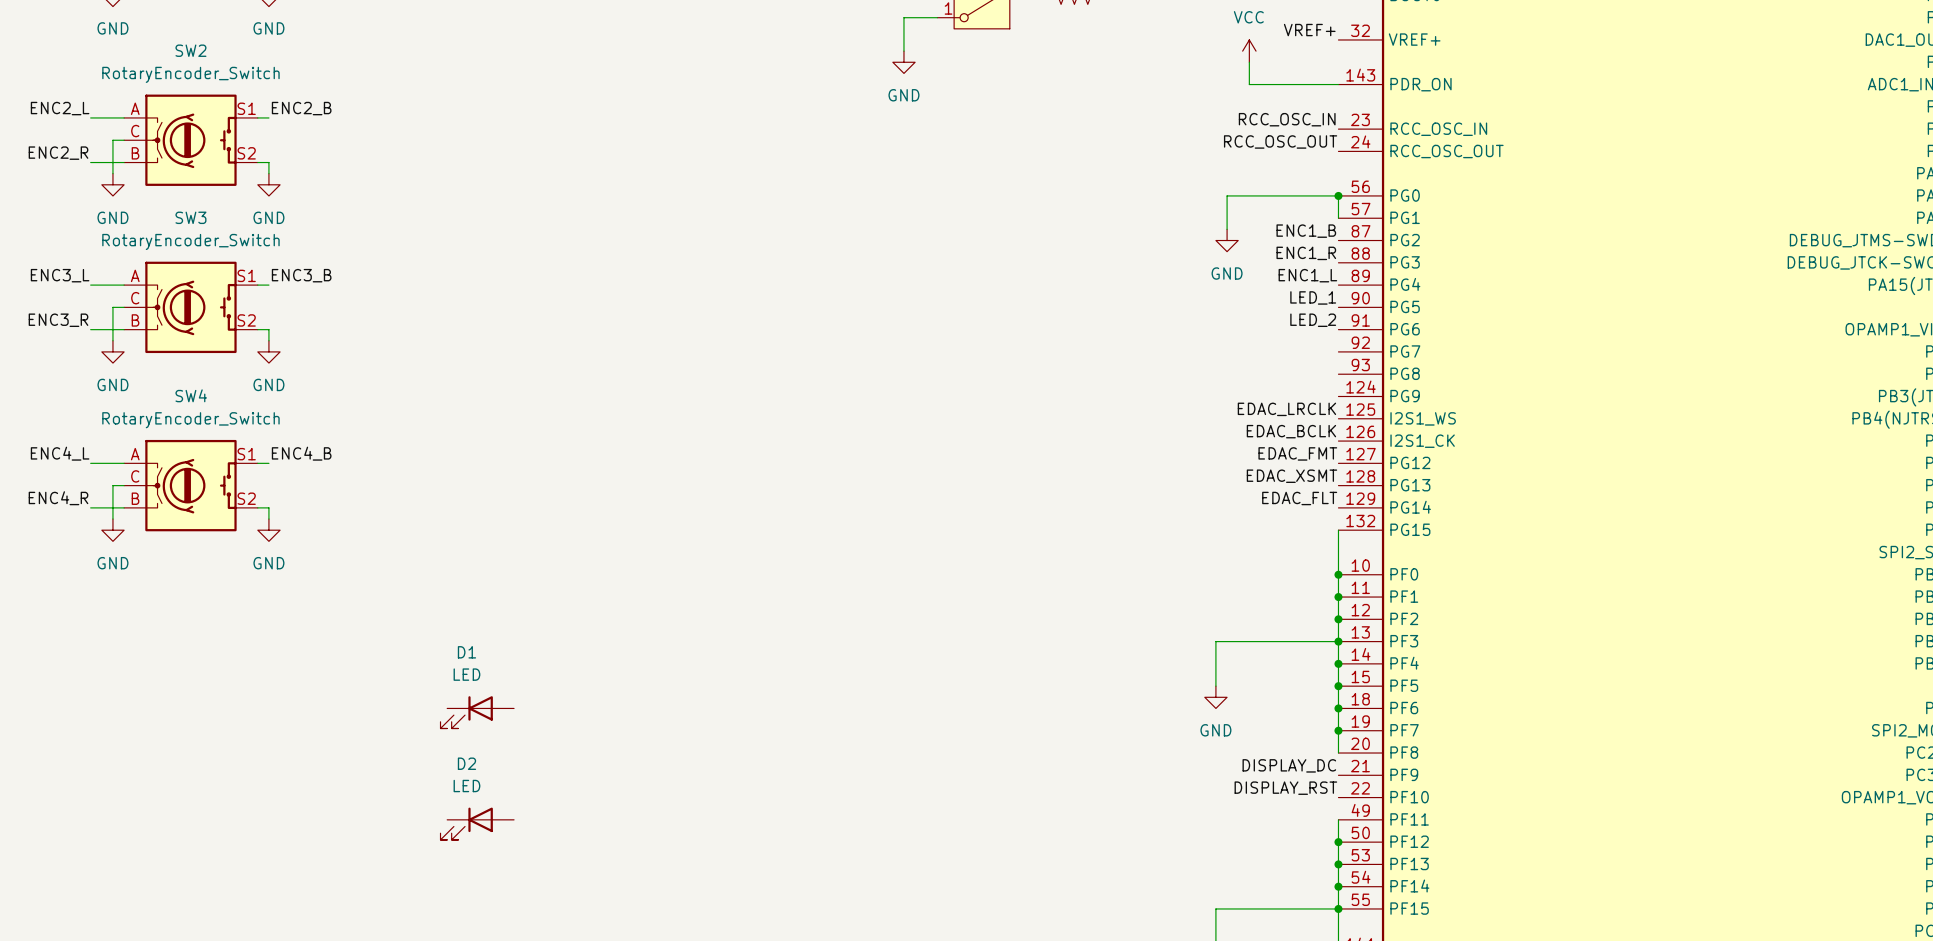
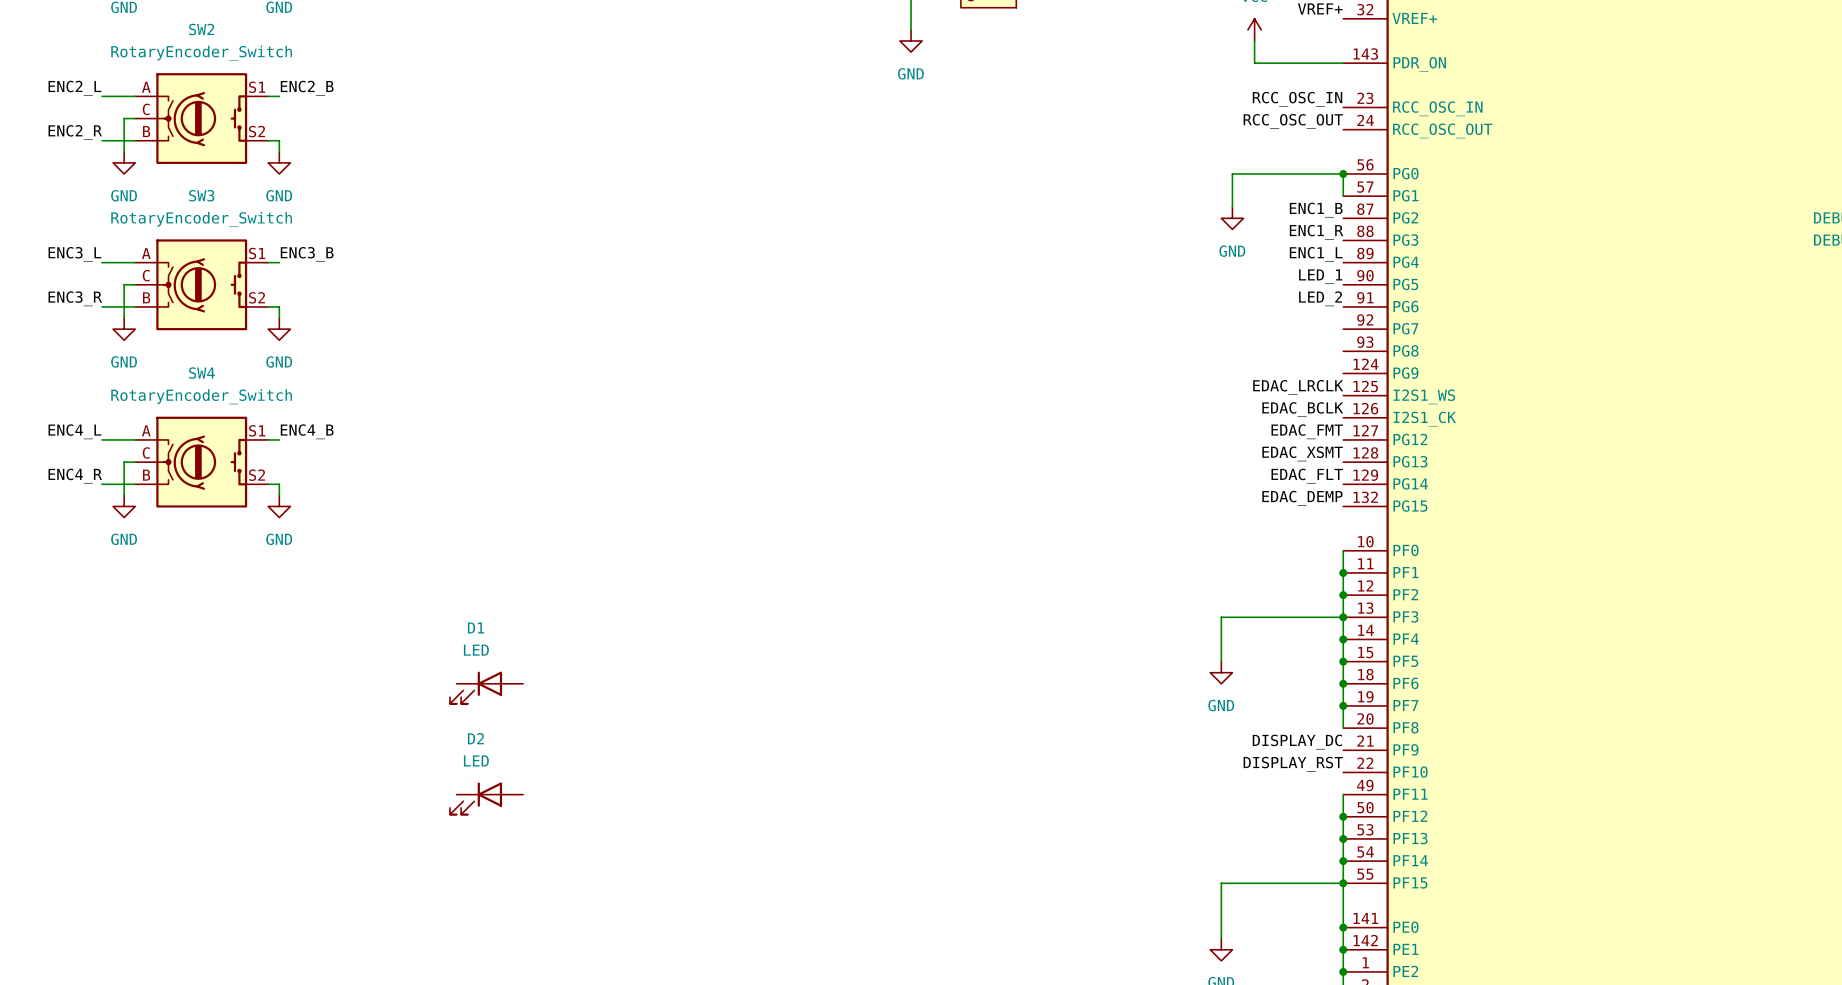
label: none -> EDAC_DEMP (1302, 498)
wire: (1338, 530) (1338, 574) -> none
junction: (1338, 574) -> none

